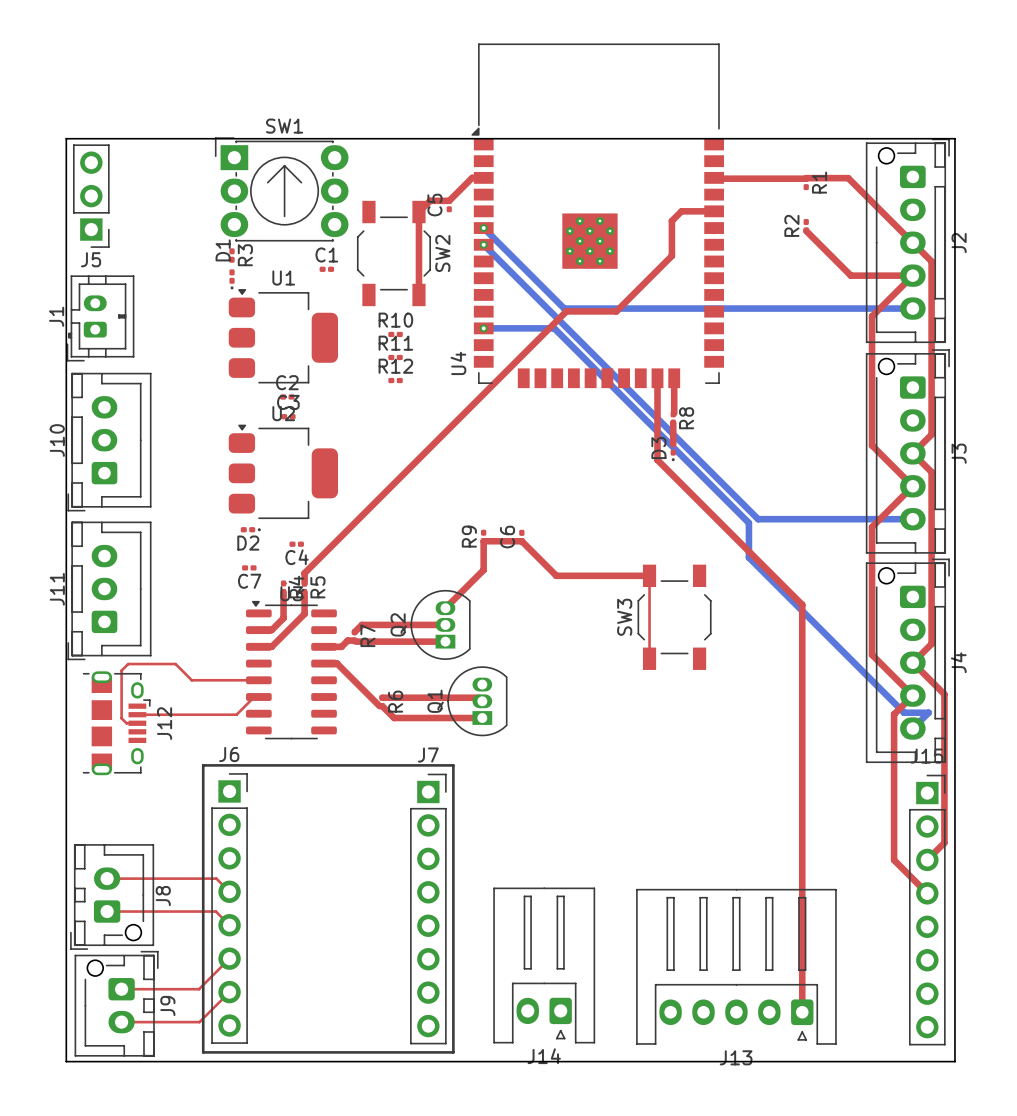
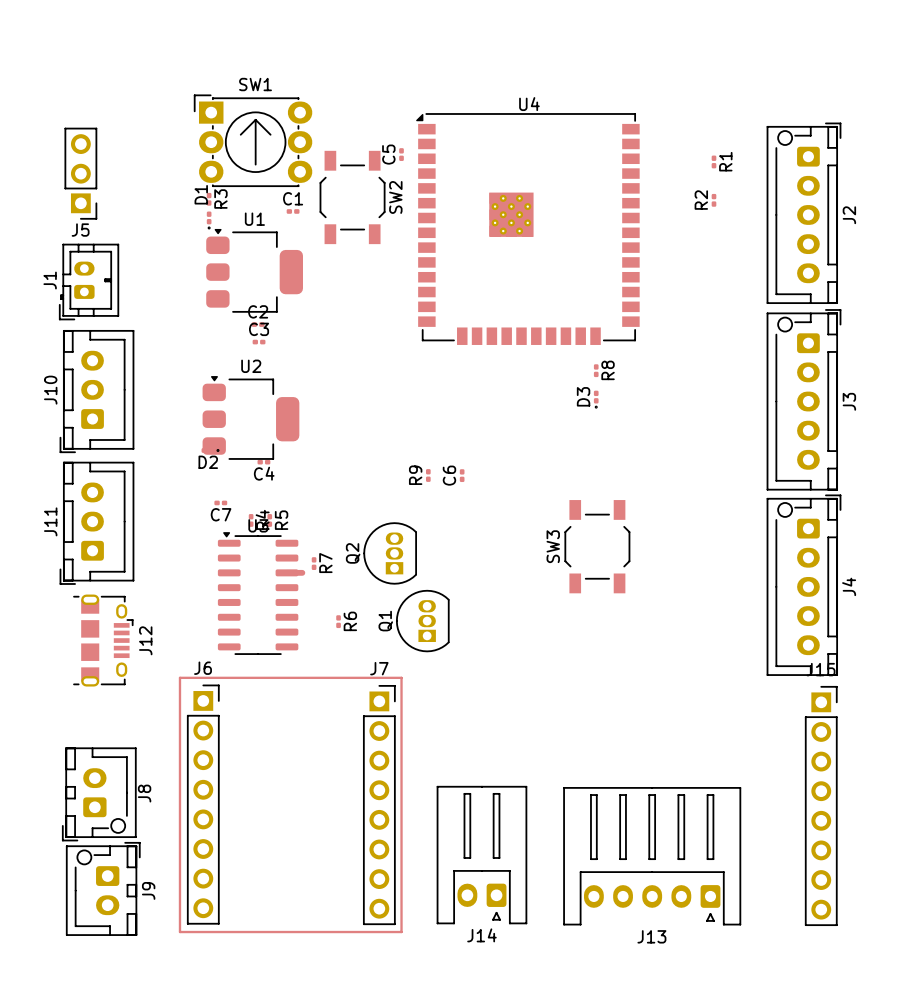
U4 footprint: [471, 43, 724, 389] -> [416, 113, 640, 345]
board edge: (66, 138) (954, 138) (954, 1061) (66, 1061) (66, 138) -> none
top track: (483, 177) (472, 177) (449, 200) (430, 200) (418, 212) (418, 294) -> none
top track: (714, 177) (806, 178) -> none
top track: (806, 178) (848, 178) (931, 261) (931, 434) (912, 453) (931, 472) (931, 643) (912, 662) (944, 694) (944, 842) (927, 859) -> none
SW1 position: (281, 189) -> (253, 140)
C5 position: (449, 205) -> (401, 154)
top track: (714, 211) (681, 211) (671, 220) (671, 255) (616, 311) (566, 311) (304, 573) (304, 583) -> none
bottom track: (483, 228) (564, 308) (912, 308) -> none
via: (483, 228) -> none
top track: (806, 230) (850, 275) (912, 275) (872, 316) (872, 445) (912, 486) (872, 527) (872, 654) (912, 695) (894, 714) (894, 860) (927, 893) -> none
bottom track: (483, 244) (758, 519) (912, 519) -> none
via: (483, 244) -> none
SW2 position: (393, 253) -> (352, 197)
R3 position: (232, 255) -> (209, 199)
C1 position: (326, 269) -> (293, 211)
D1 position: (232, 279) -> (209, 220)
bottom track: (483, 328) (554, 328) (748, 523) (748, 557) (904, 712) (928, 712) (912, 728) -> none
via: (483, 328) -> none
R10: (395, 334) -> none
U1 position: (283, 336) -> (254, 270)
R11: (395, 357) -> none
U4 name position: U4 (458, 363) -> U4 (529, 104)
top track: (657, 378) (657, 460) (802, 604) (802, 1012) -> none
top track: (674, 378) (673, 414) -> none
R12: (395, 380) -> none
C2 position: (287, 396) -> (258, 324)
C3 position: (288, 416) -> (259, 342)
top track: (673, 422) (673, 444) -> none
D2 position: (250, 529) -> (210, 450)
top track: (483, 541) (483, 570) (444, 608) -> none
top track: (483, 541) (521, 541) (556, 575) (649, 575) (649, 658) -> none
C4 position: (296, 544) -> (263, 462)
top track: (283, 592) (283, 618) (271, 630) (258, 630) -> none
top track: (304, 592) (304, 613) (271, 646) (258, 646) -> none
top track: (445, 624) (361, 624) (354, 632) -> none
top track: (445, 641) (347, 640) (341, 646) -> none
top track: (324, 663) (337, 663) (394, 718) (482, 718) -> none
top track: (258, 680) (191, 680) (175, 664) (128, 664) (121, 670) (121, 718) (126, 723) (137, 723) -> none
top track: (258, 697) (254, 697) (236, 714) (137, 714) -> none
top track: (382, 697) (478, 697) (482, 701) -> none
line: (203, 765) (453, 765) (453, 1052) (203, 1052) (203, 765) -> none
top track: none -> (179, 677) (401, 677) (401, 932) (179, 932) (179, 677)
top track: (107, 878) (216, 878) (229, 891) -> none
top track: (107, 911) (215, 911) (229, 925) -> none
top track: (229, 958) (199, 989) (121, 989) -> none
top track: (229, 992) (199, 1022) (121, 1022) -> none

